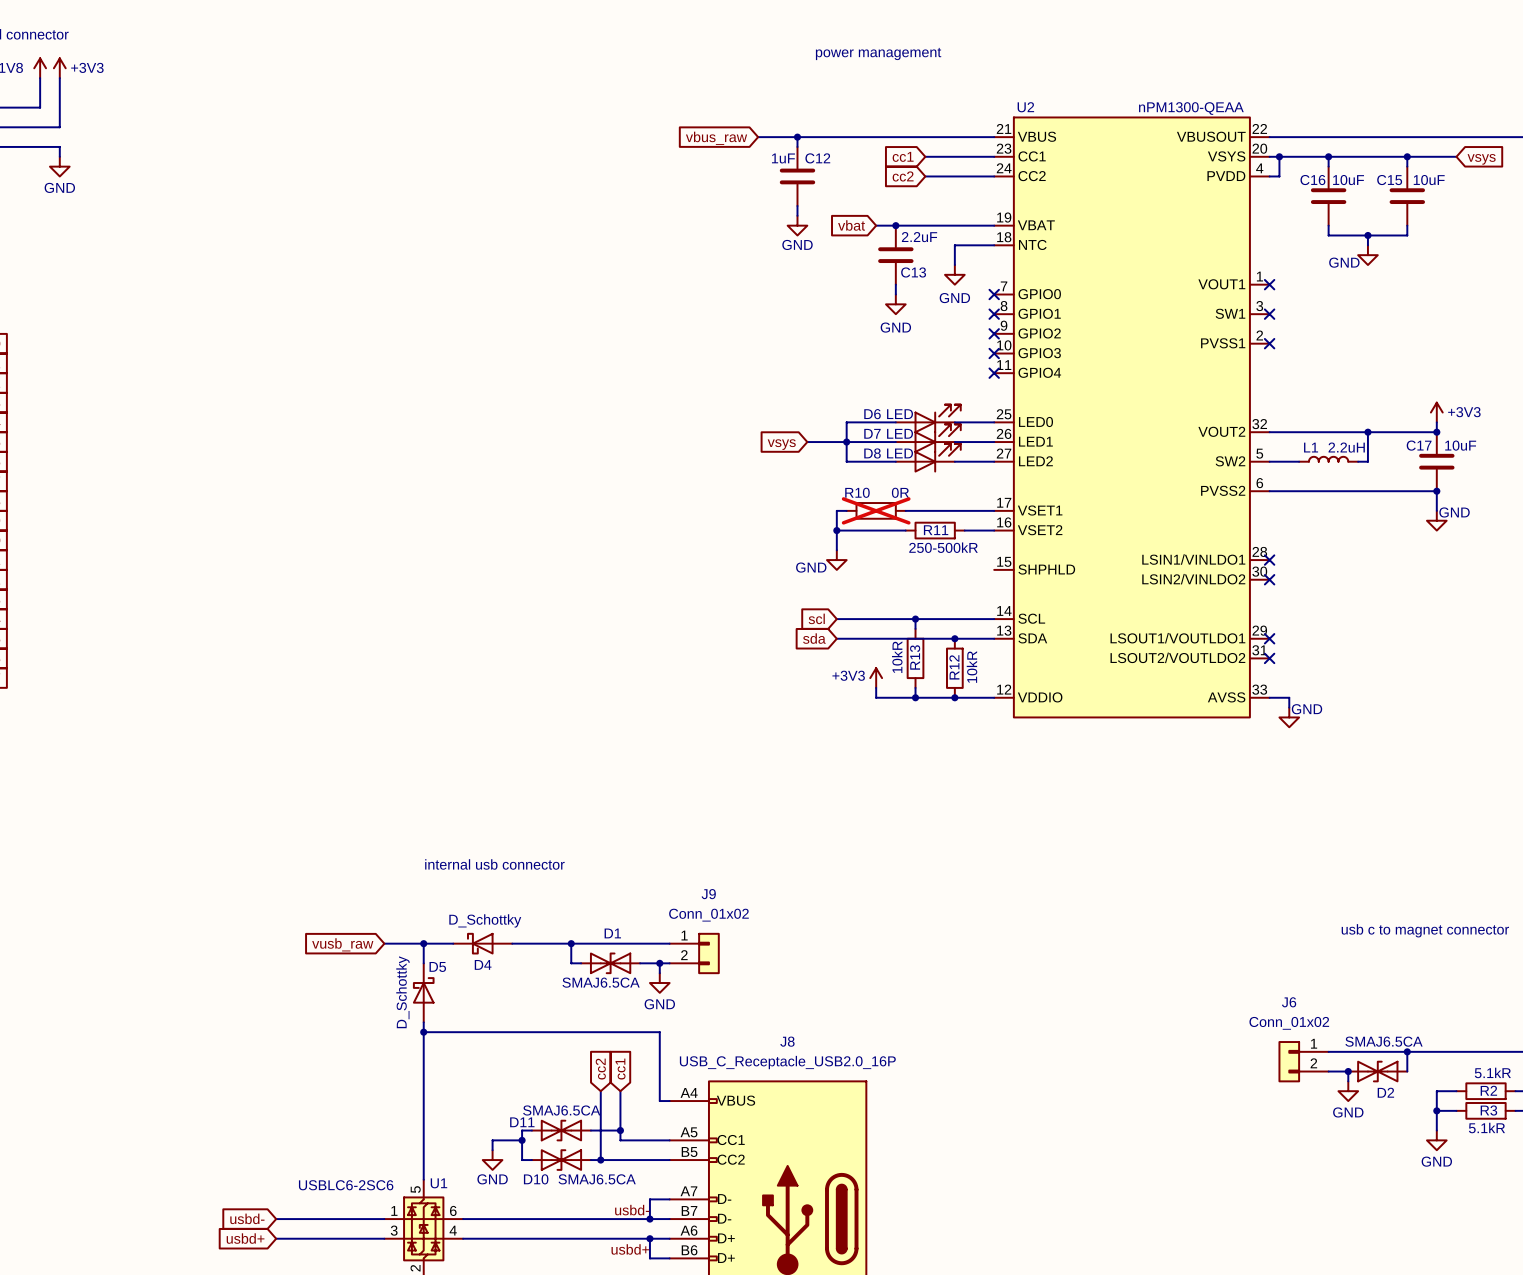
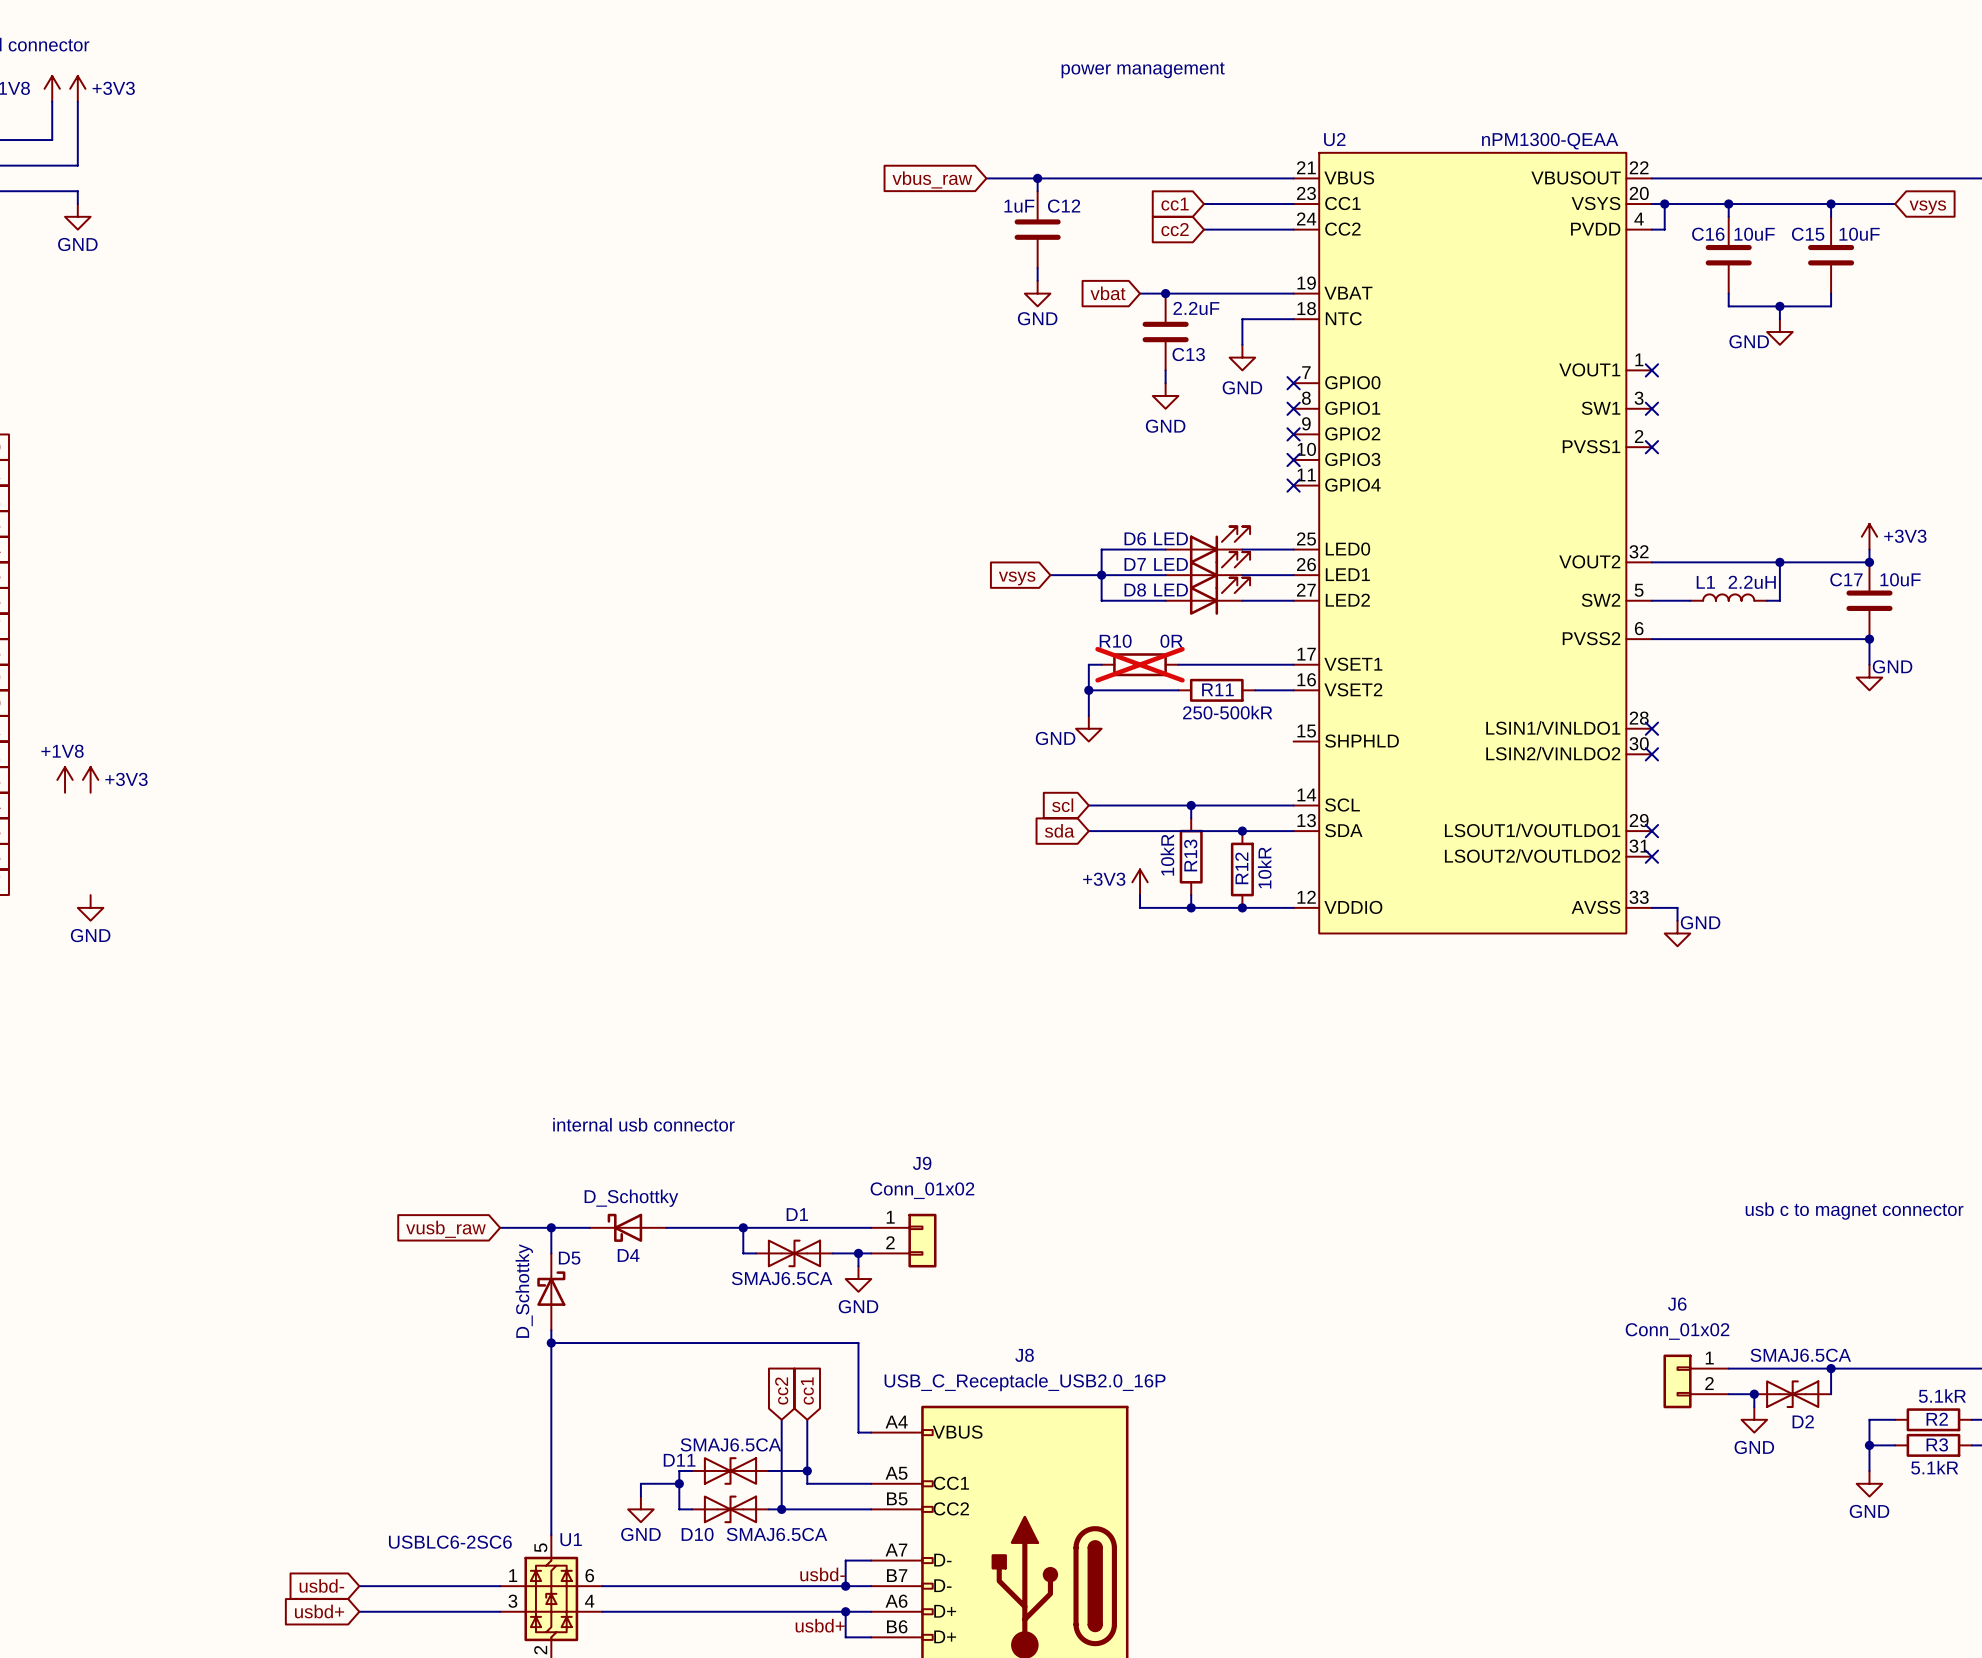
power symbol: none -> +1V8 (65, 779)
power symbol: none -> +3V3 (90, 779)
power symbol: none -> GND (90, 907)

